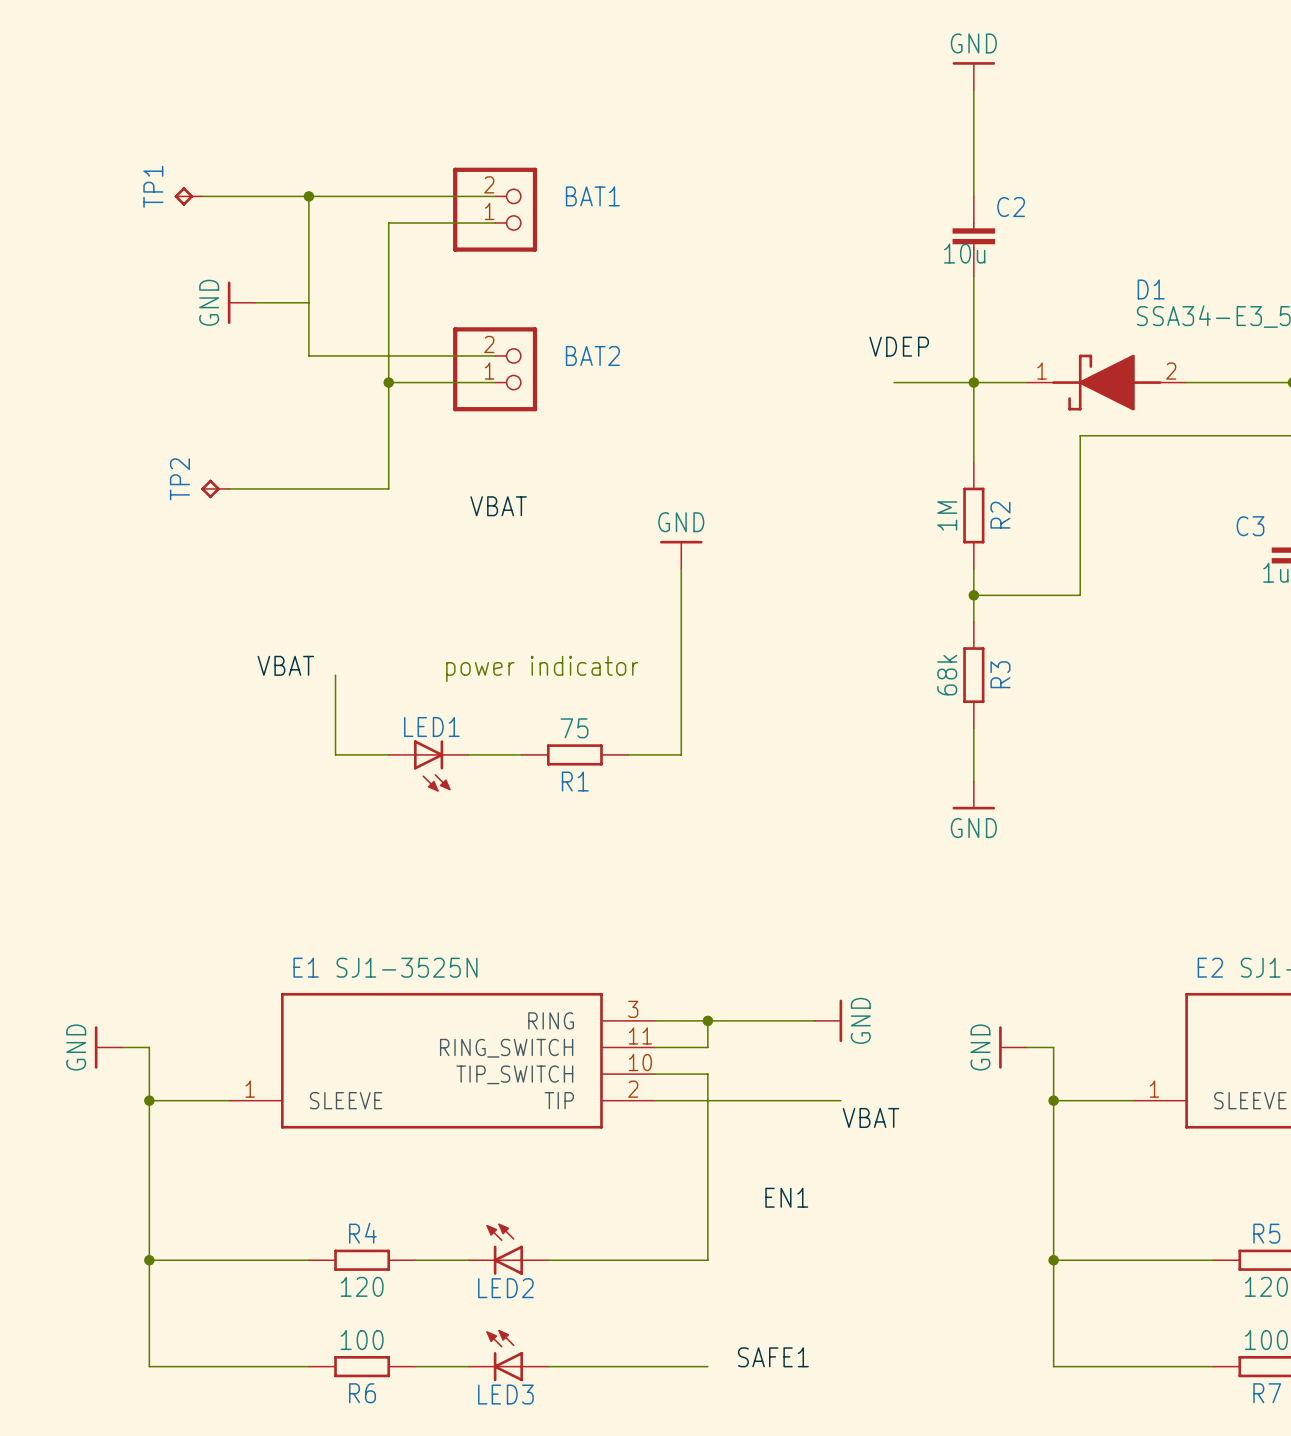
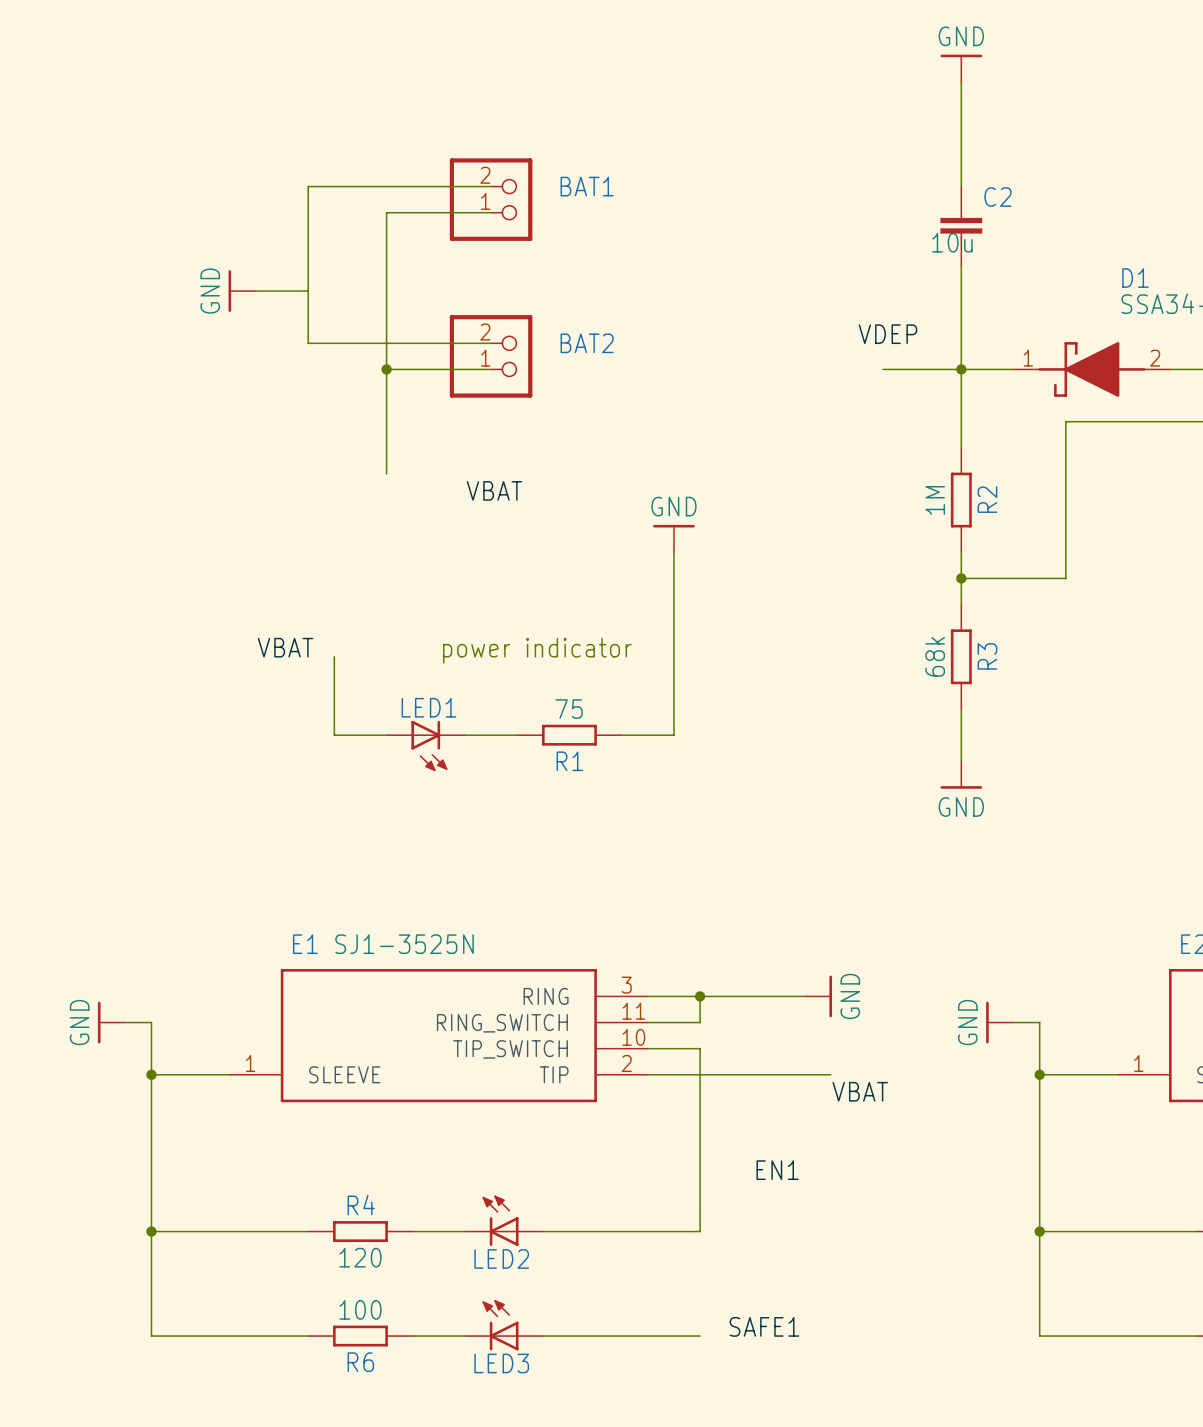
TP1: (188, 196) -> none
wire: (202, 196) (308, 196) -> none
junction: (308, 196) -> none
TP2: (215, 488) -> none
wire: (229, 488) (388, 488) -> none

